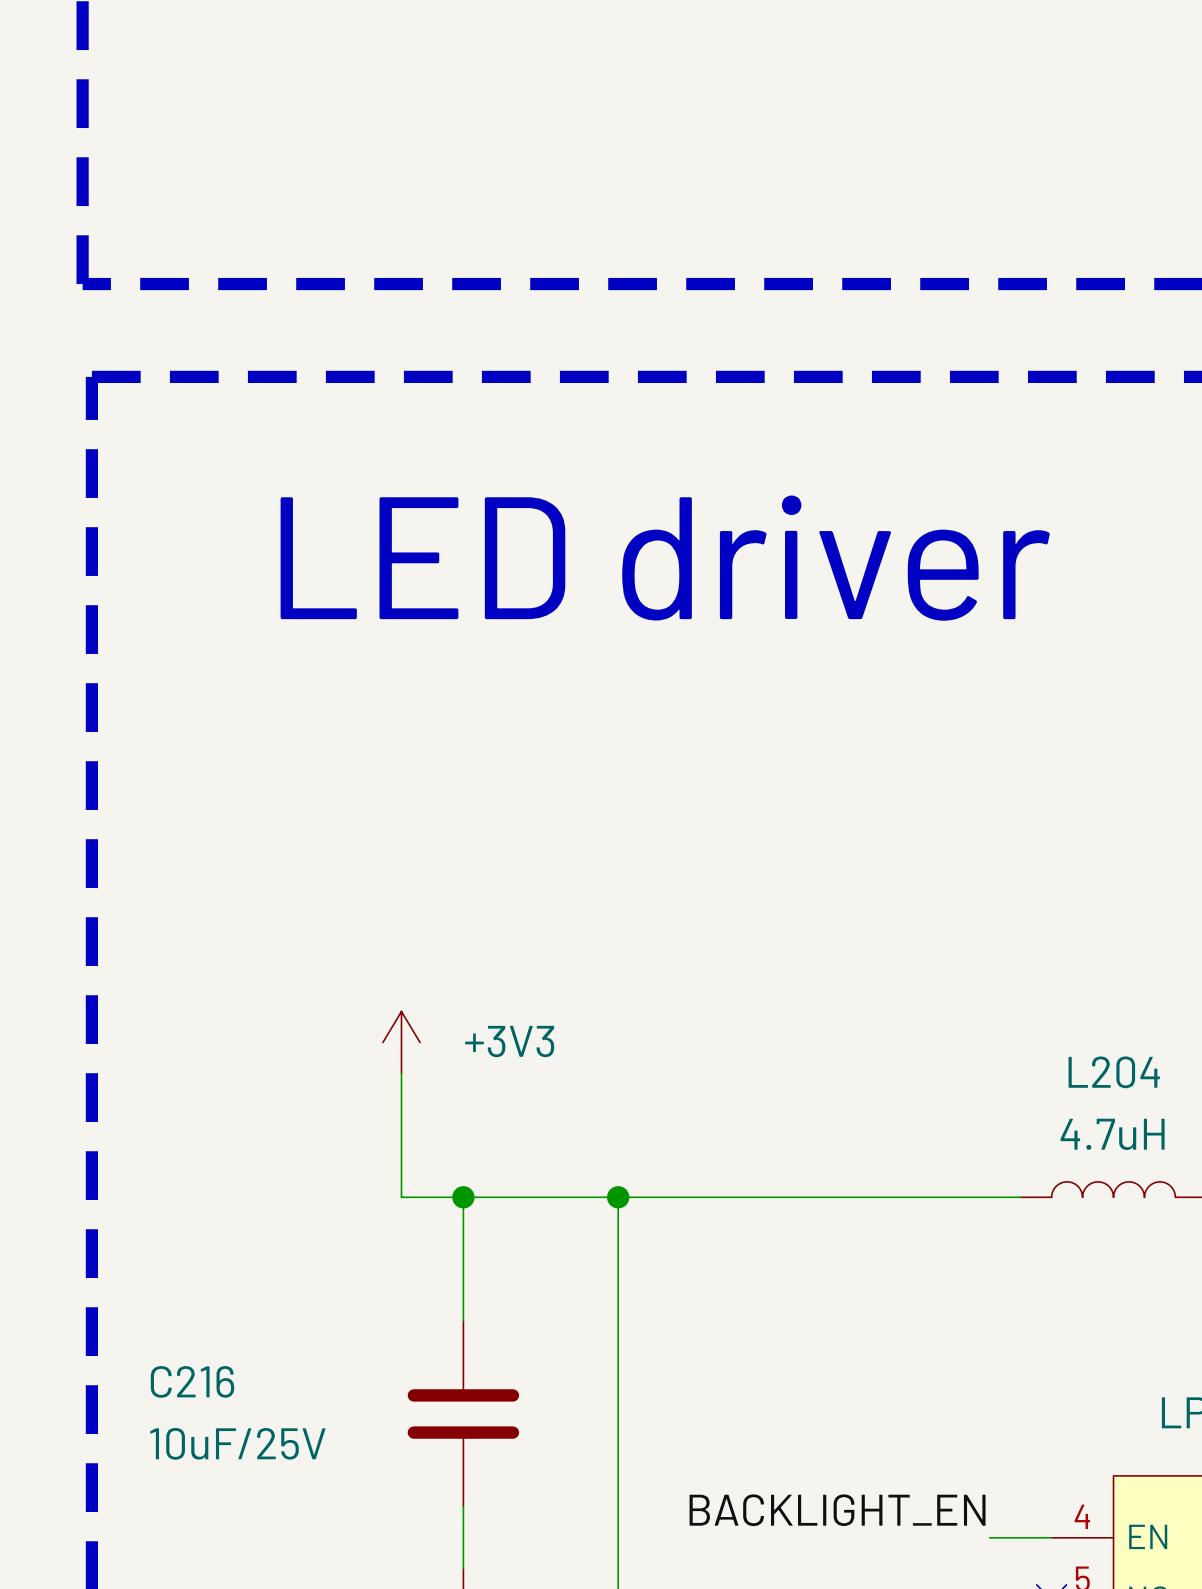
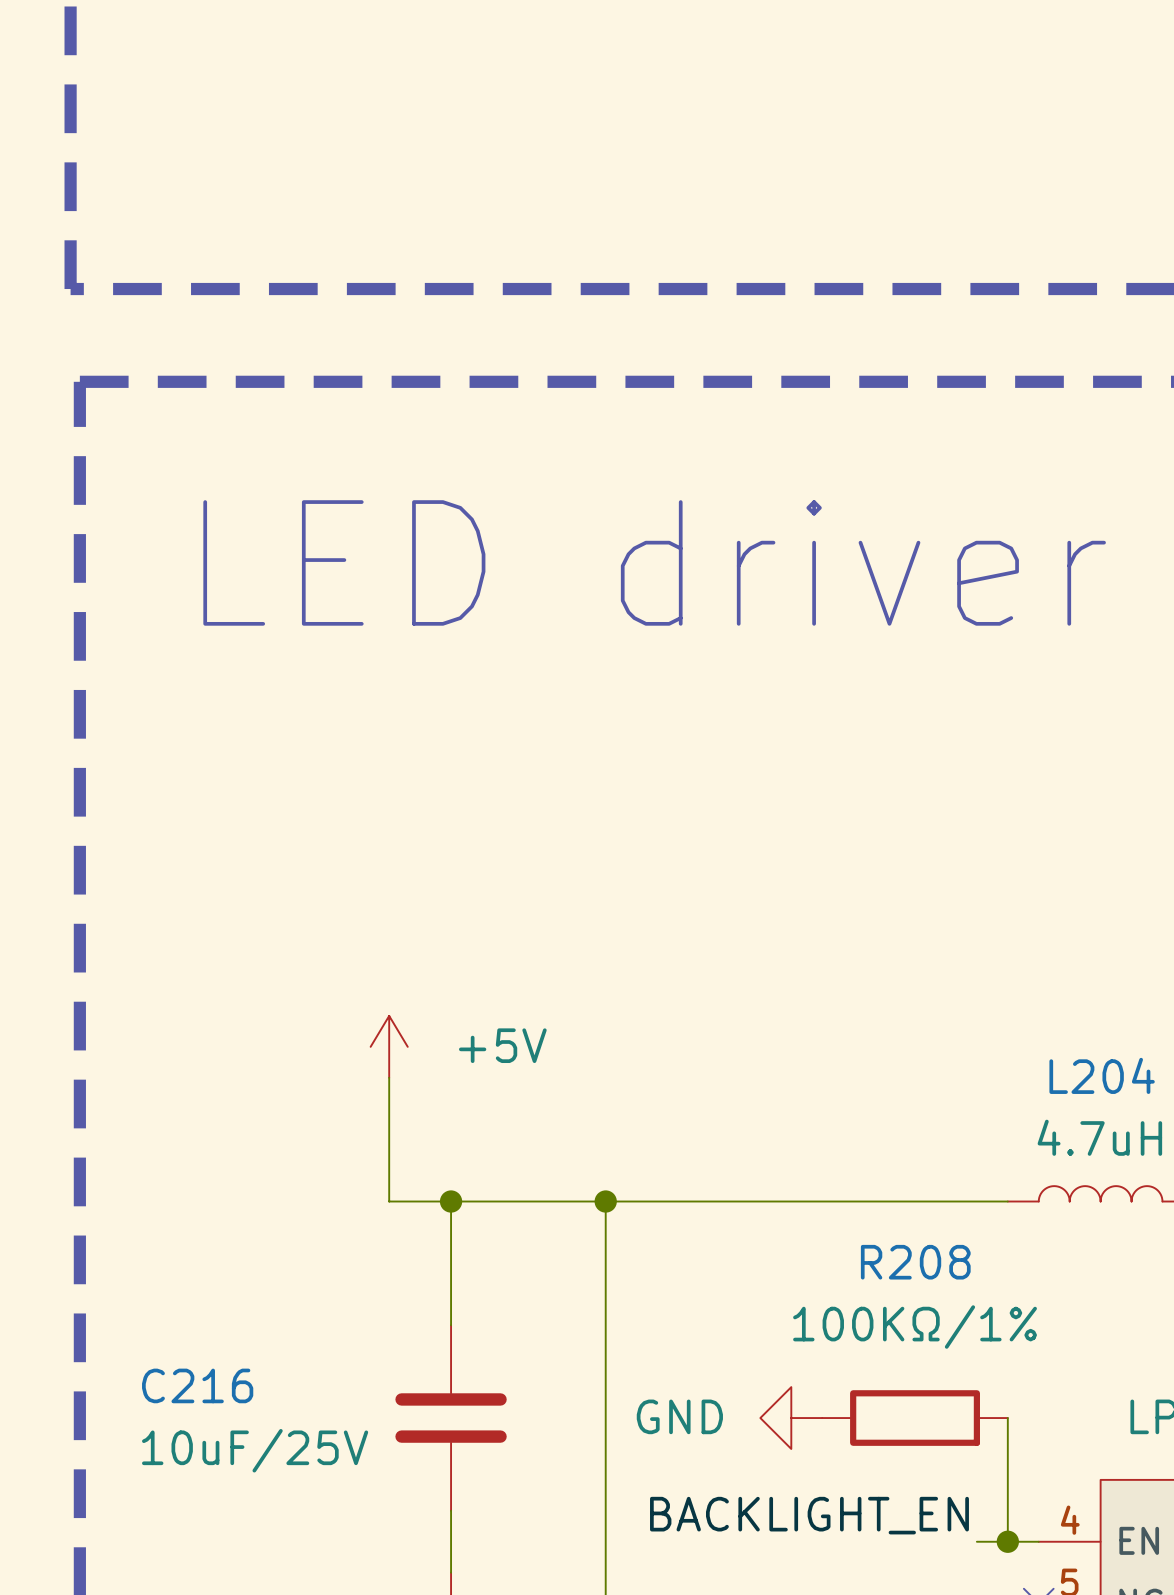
power symbol: +3V3 (401, 1042) -> +5V (389, 1046)
power symbol: none -> GND (791, 1418)
R208: none -> 100KΩ/1% (915, 1418)
wire: none -> (1007, 1418) (1007, 1541)
junction: none -> (1007, 1541)

